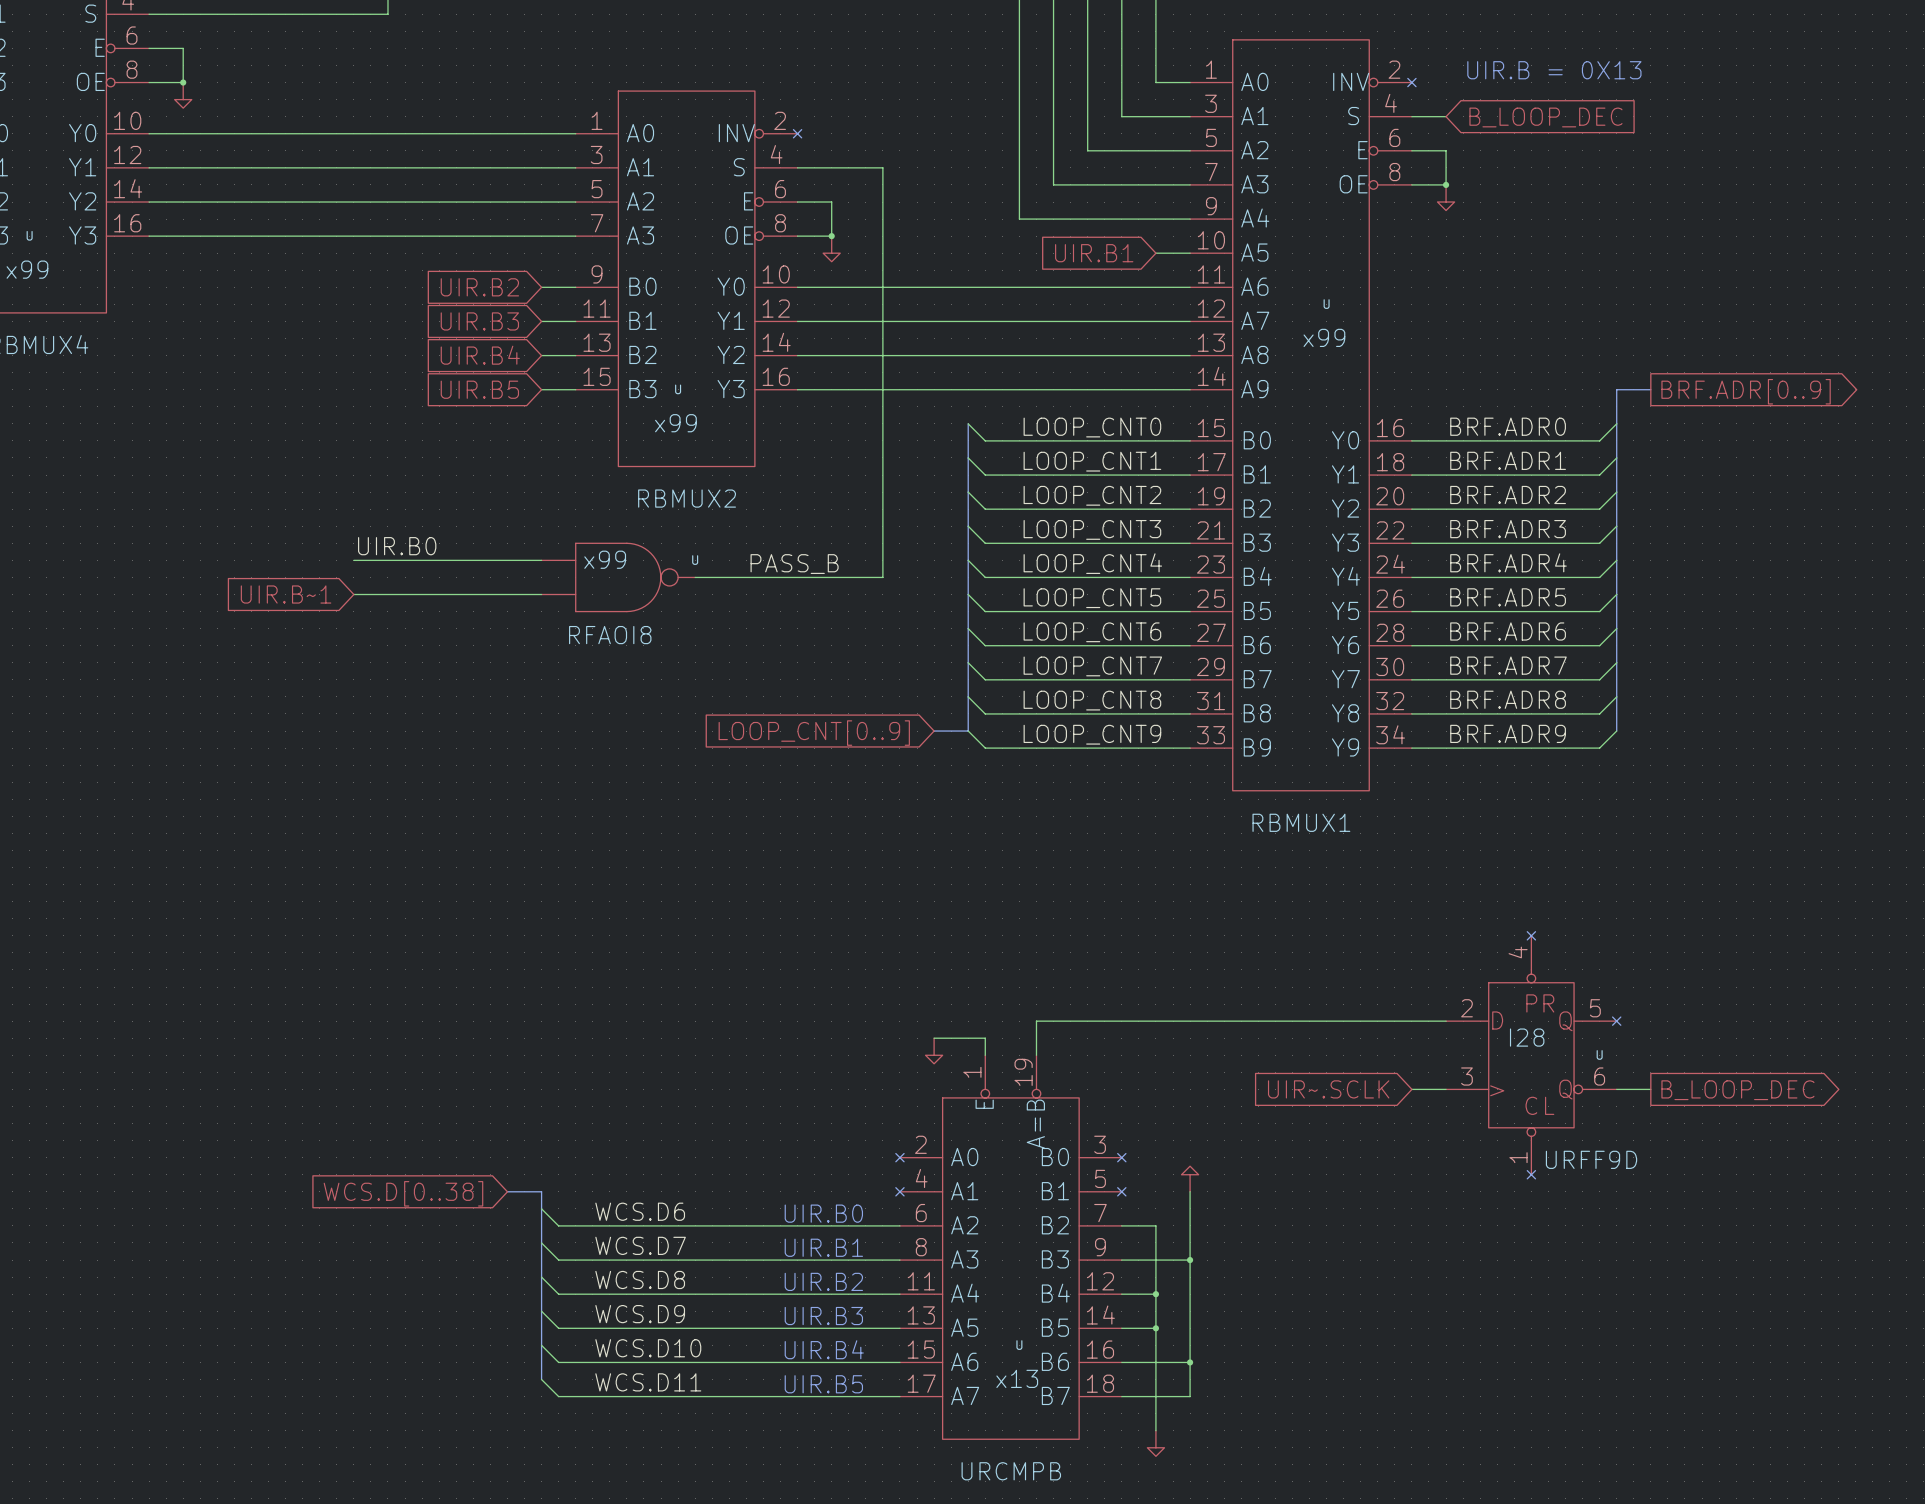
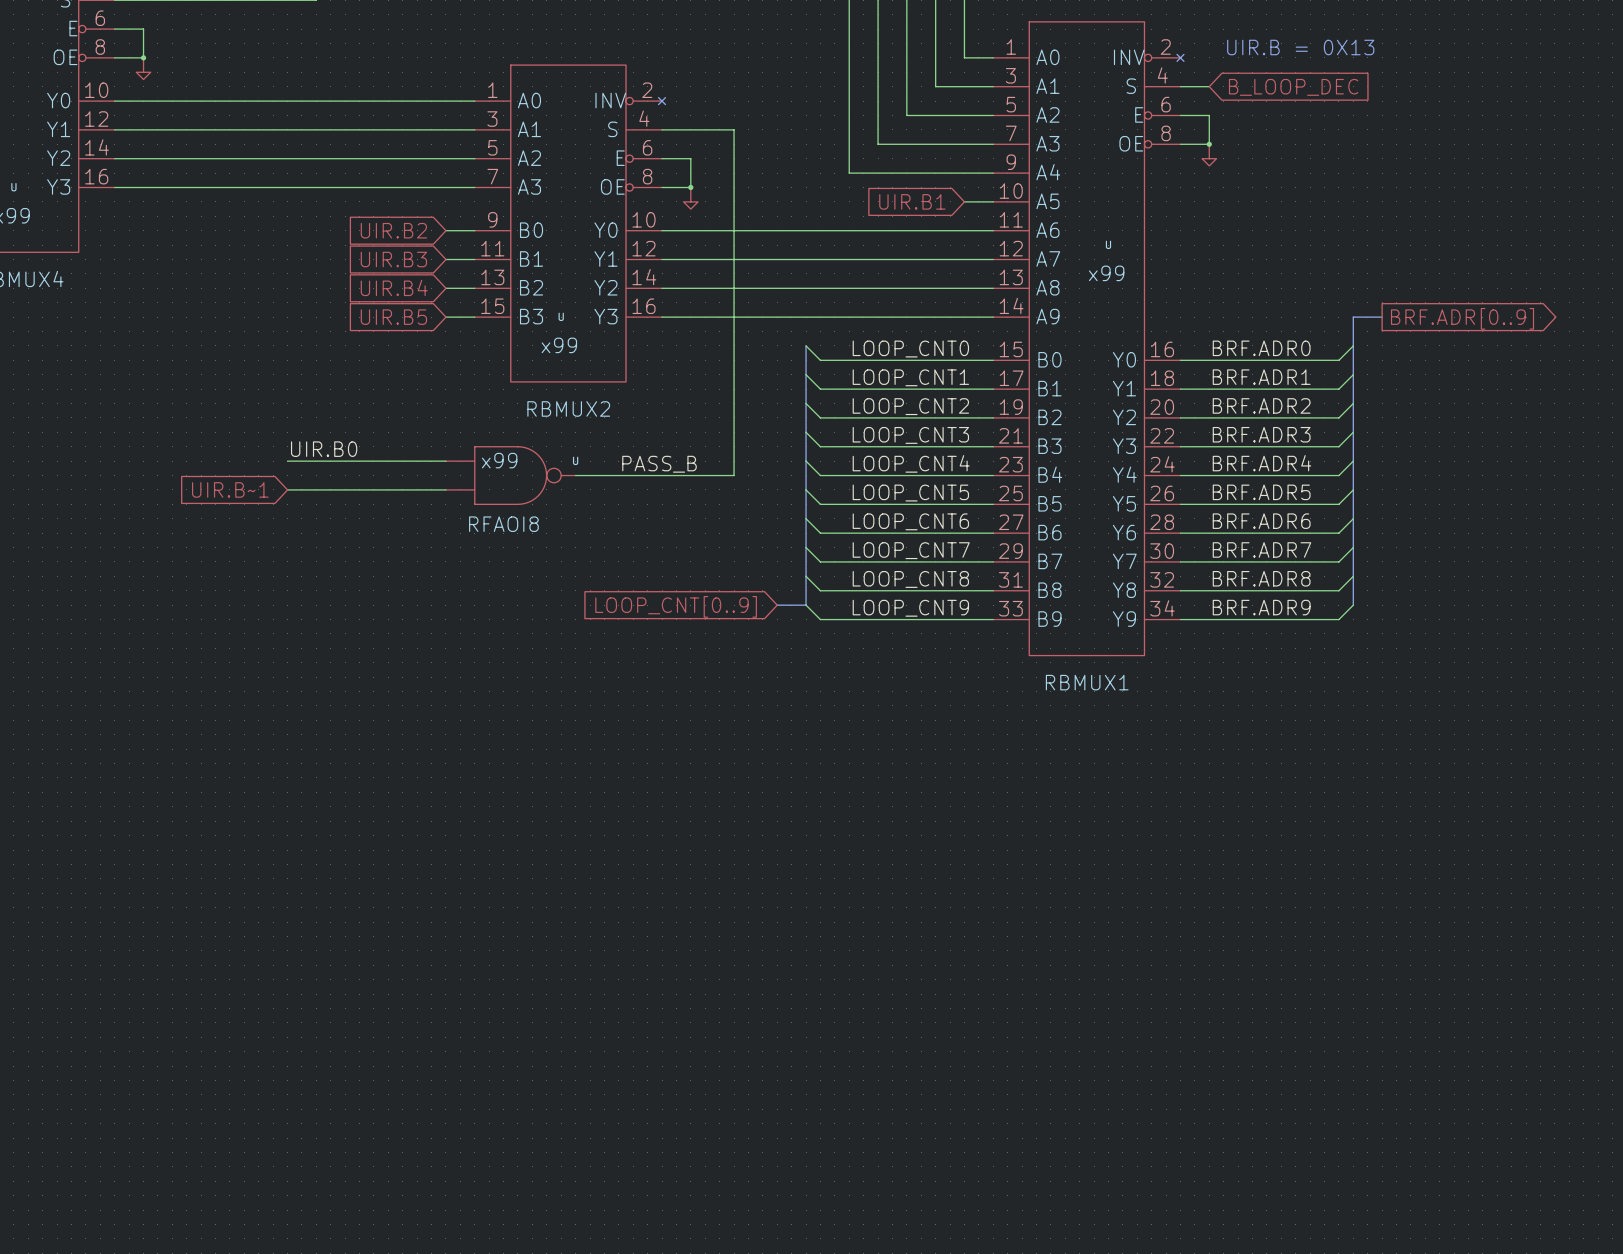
no-connect mark: (1531, 935) -> none
wire: (1446, 1021) (1036, 1021) (1036, 1055) -> none
no-connect mark: (1616, 1021) -> none
wire: (934, 1038) (985, 1038) (985, 1055) -> none
power symbol: (934, 1051) -> none
U: (1531, 1055) -> none
global label: UIR~.SCLK (1328, 1089) -> none
wire: (1411, 1089) (1446, 1089) -> none
wire: (1616, 1089) (1650, 1089) -> none
global label: B_LOOP_DEC (1737, 1090) -> none
no-connect mark: (899, 1157) -> none
no-connect mark: (1121, 1157) -> none
no-connect mark: (1531, 1174) -> none
power symbol: (1190, 1178) -> none
bus: (507, 1191) (541, 1191) (541, 1379) -> none
no-connect mark: (899, 1191) -> none
no-connect mark: (1121, 1191) -> none
wire: (1190, 1191) (1190, 1396) (1121, 1396) -> none
global label: WCS.D[0..38] (403, 1193) -> none
wire: (541, 1208) (558, 1225) (899, 1225) -> none
label: WCS.D6 (640, 1211) -> none
text: UIR.B0 (823, 1213) -> none
wire: (1121, 1225) (1155, 1225) (1155, 1430) -> none
wire: (541, 1242) (558, 1260) (899, 1260) -> none
label: WCS.D7 (640, 1245) -> none
text: UIR.B1 (823, 1247) -> none
U: (1010, 1247) -> none
wire: (1121, 1260) (1190, 1260) -> none
junction: (1190, 1260) -> none
wire: (541, 1277) (558, 1294) (899, 1294) -> none
label: WCS.D8 (640, 1279) -> none
text: UIR.B2 (823, 1281) -> none
wire: (1121, 1294) (1155, 1294) -> none
junction: (1155, 1294) -> none
wire: (541, 1311) (558, 1328) (899, 1328) -> none
label: WCS.D9 (640, 1314) -> none
text: UIR.B3 (823, 1316) -> none
wire: (1121, 1328) (1155, 1328) -> none
junction: (1155, 1328) -> none
wire: (541, 1345) (558, 1362) (899, 1362) -> none
label: WCS.D10 (648, 1348) -> none
text: UIR.B4 (824, 1349) -> none
wire: (1121, 1362) (1190, 1362) -> none
junction: (1190, 1362) -> none
wire: (541, 1379) (558, 1396) (899, 1396) -> none
label: WCS.D11 (648, 1382) -> none
text: UIR.B5 (823, 1384) -> none
power symbol: (1155, 1443) -> none

